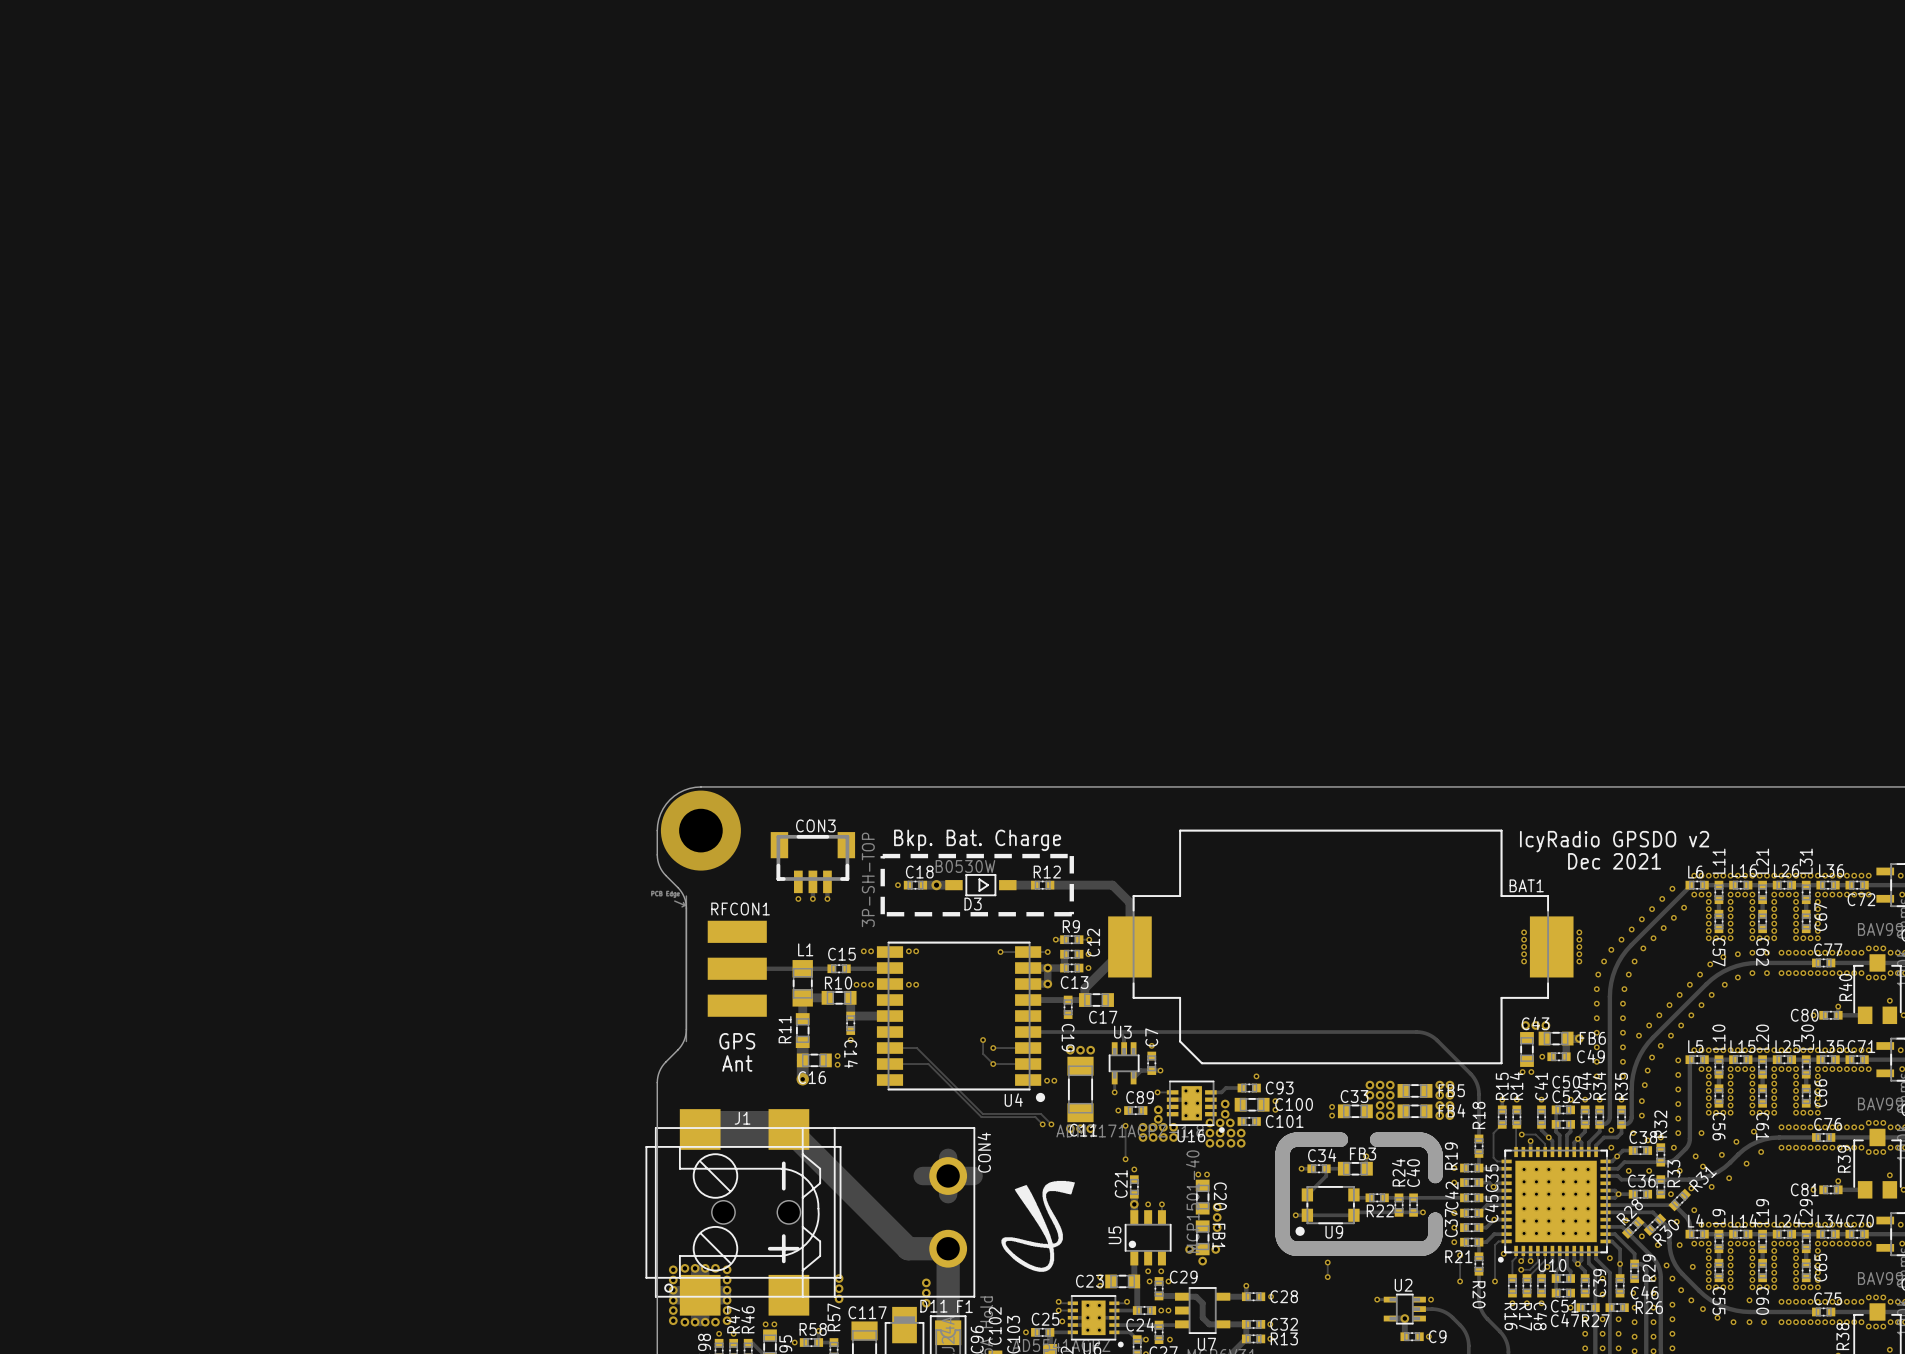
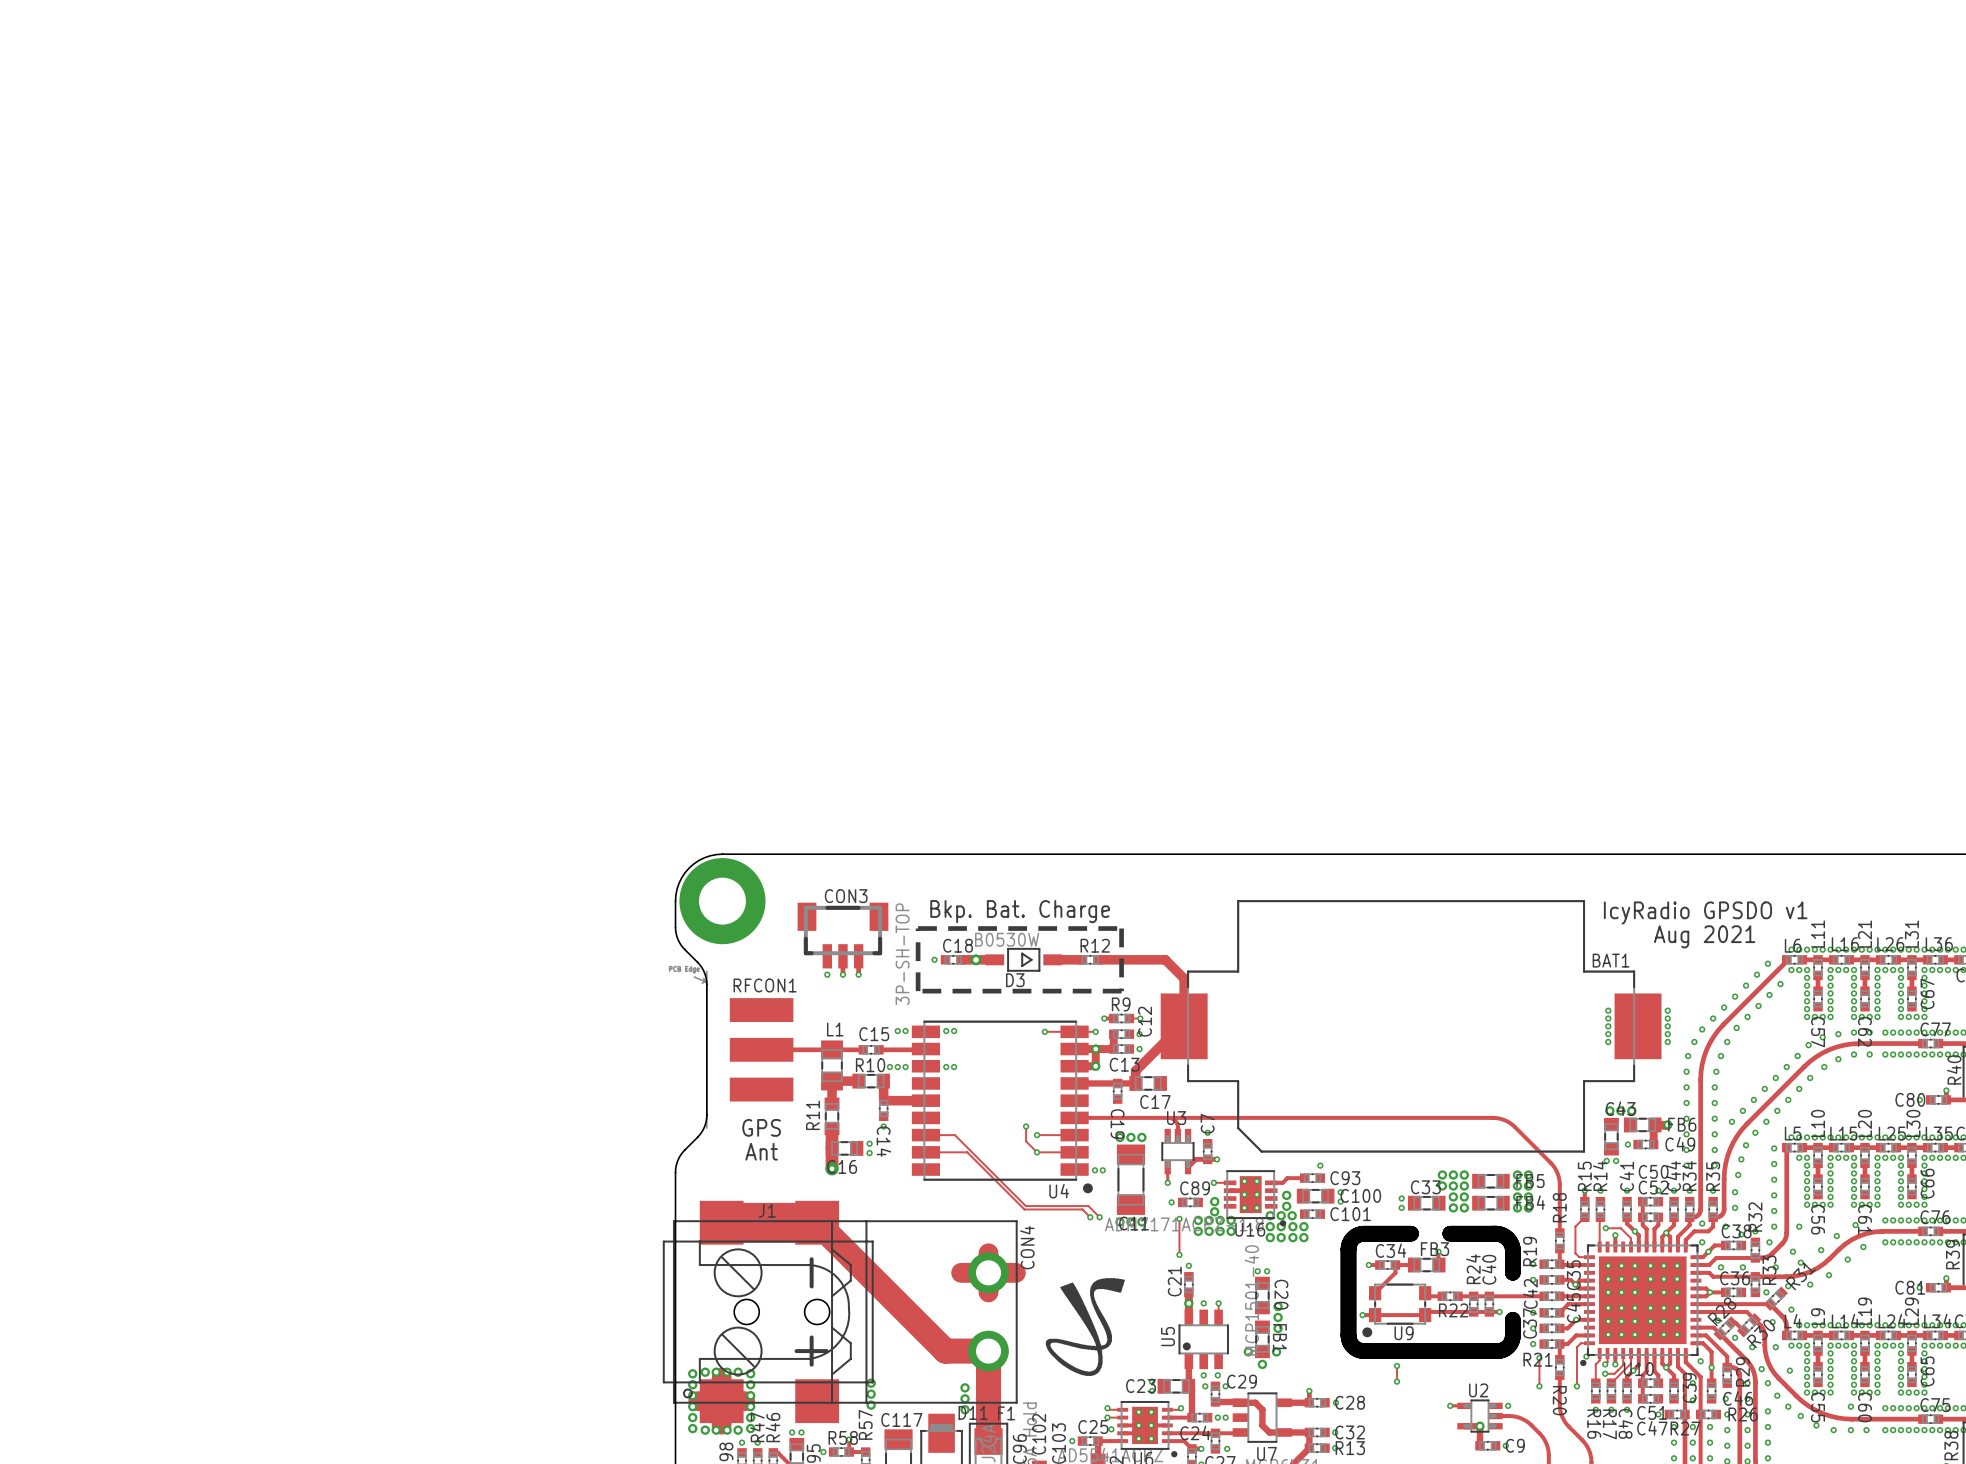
text: IcyRadio GPSDO v2 (1614, 841) -> IcyRadio GPSDO v1 (1705, 912)
text: Dec 2021 (1614, 861) -> Aug 2021 (1704, 936)

